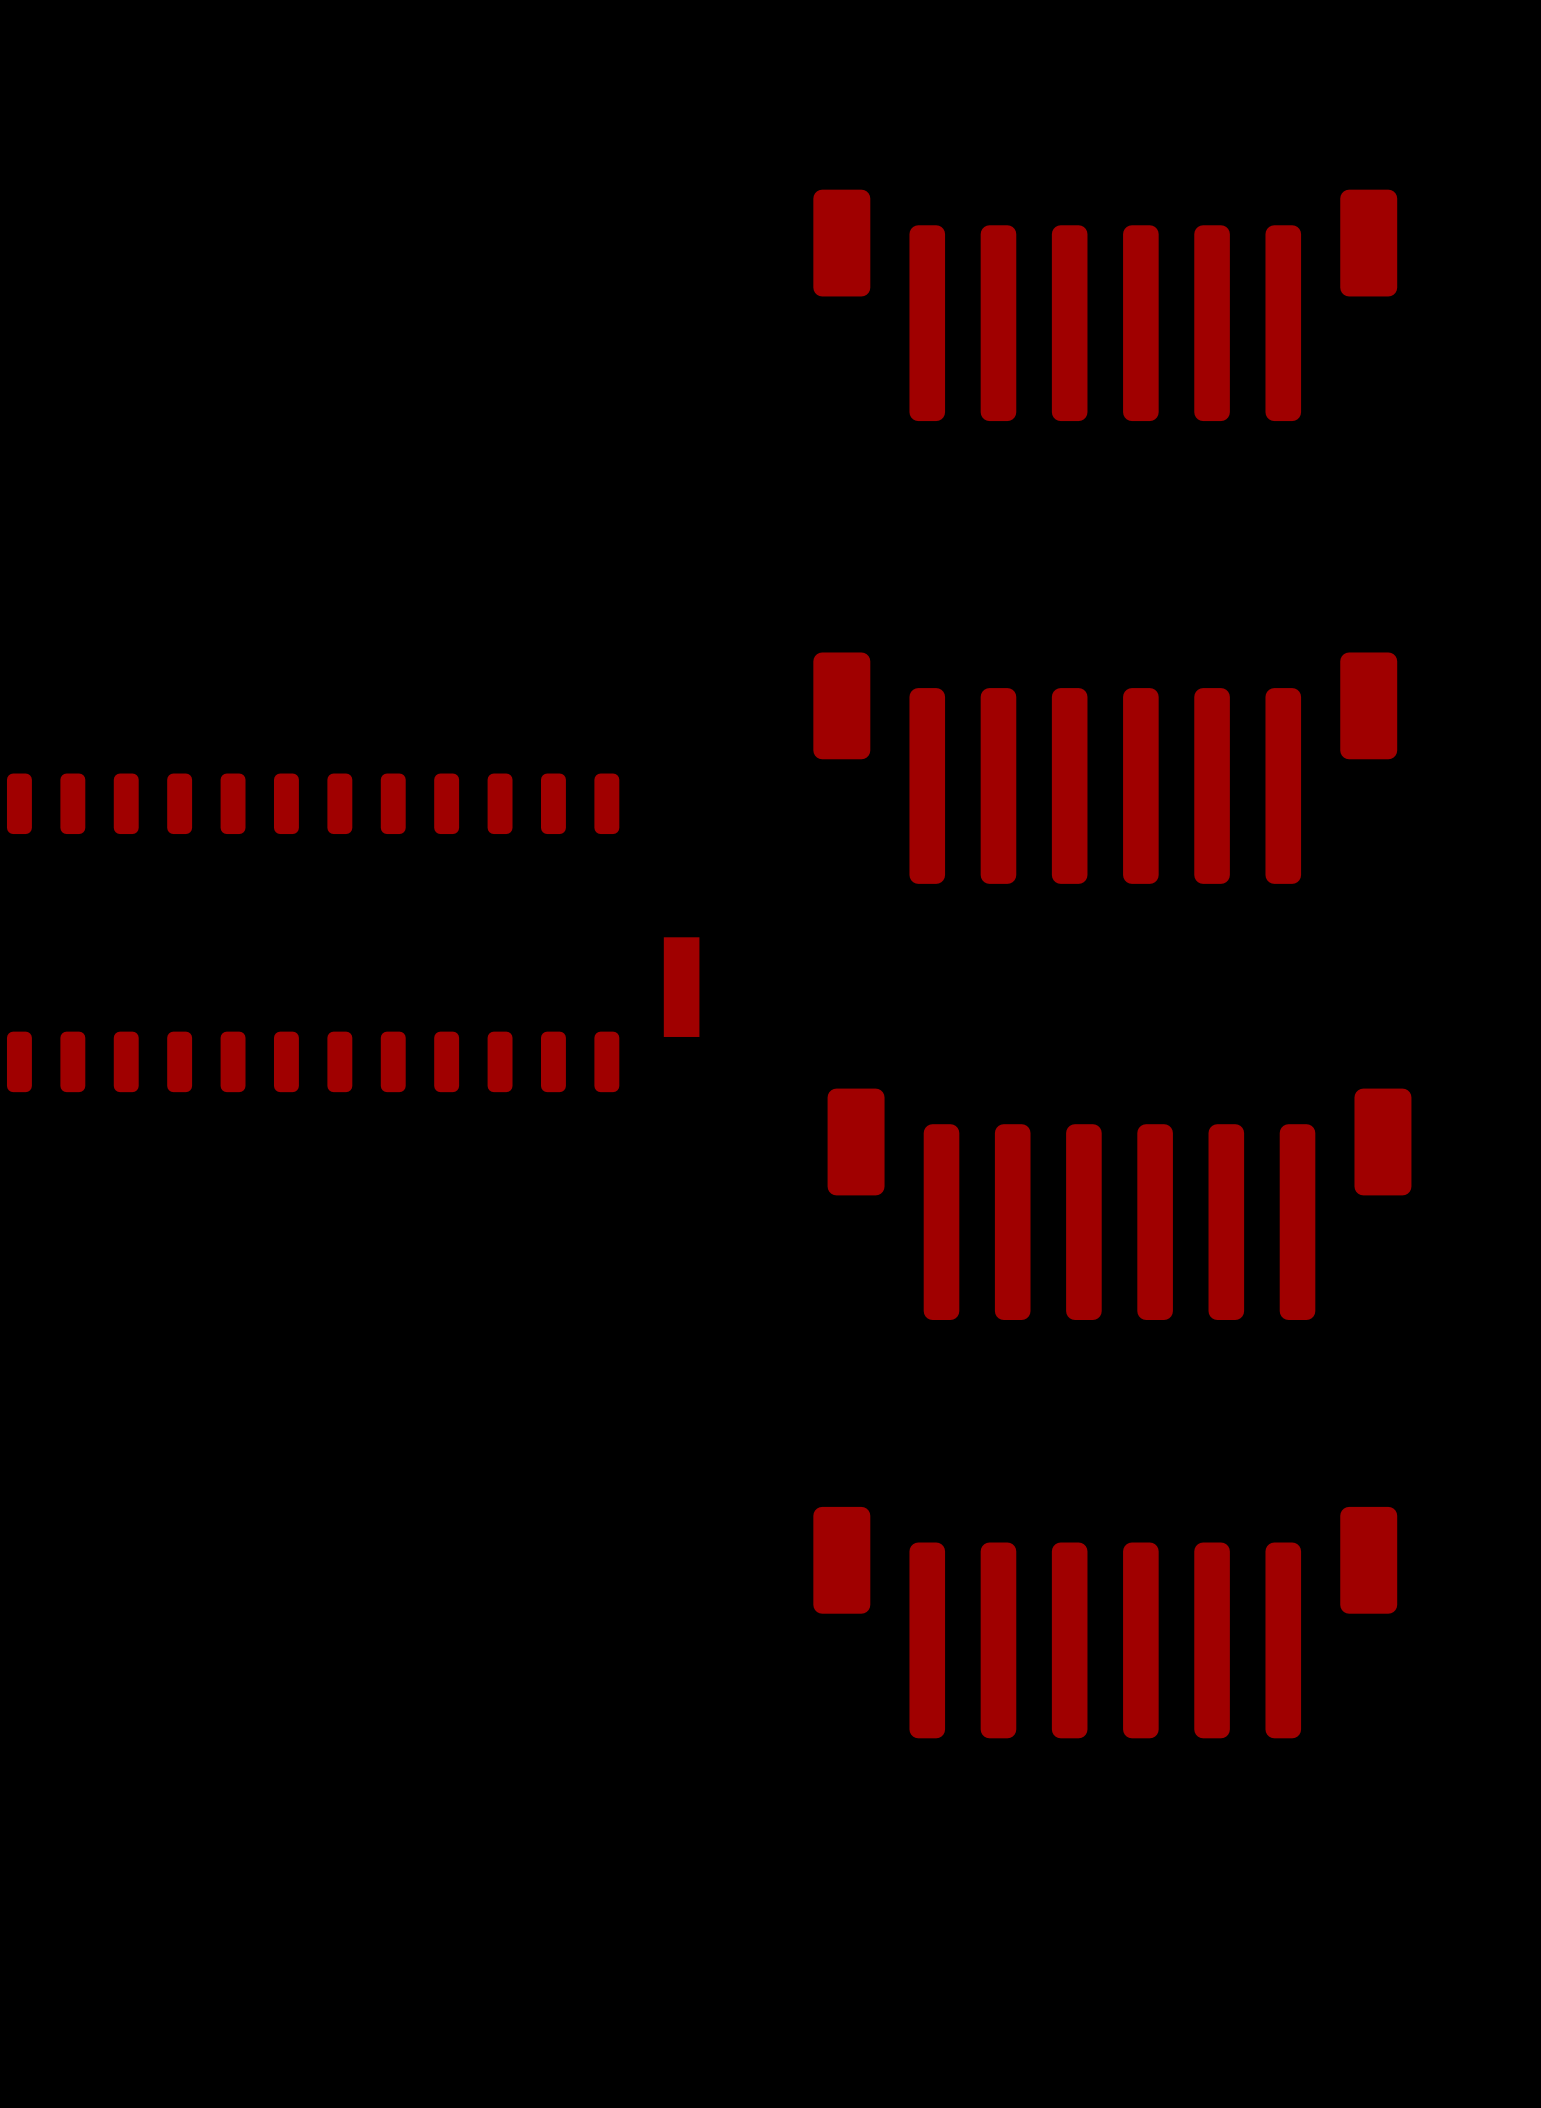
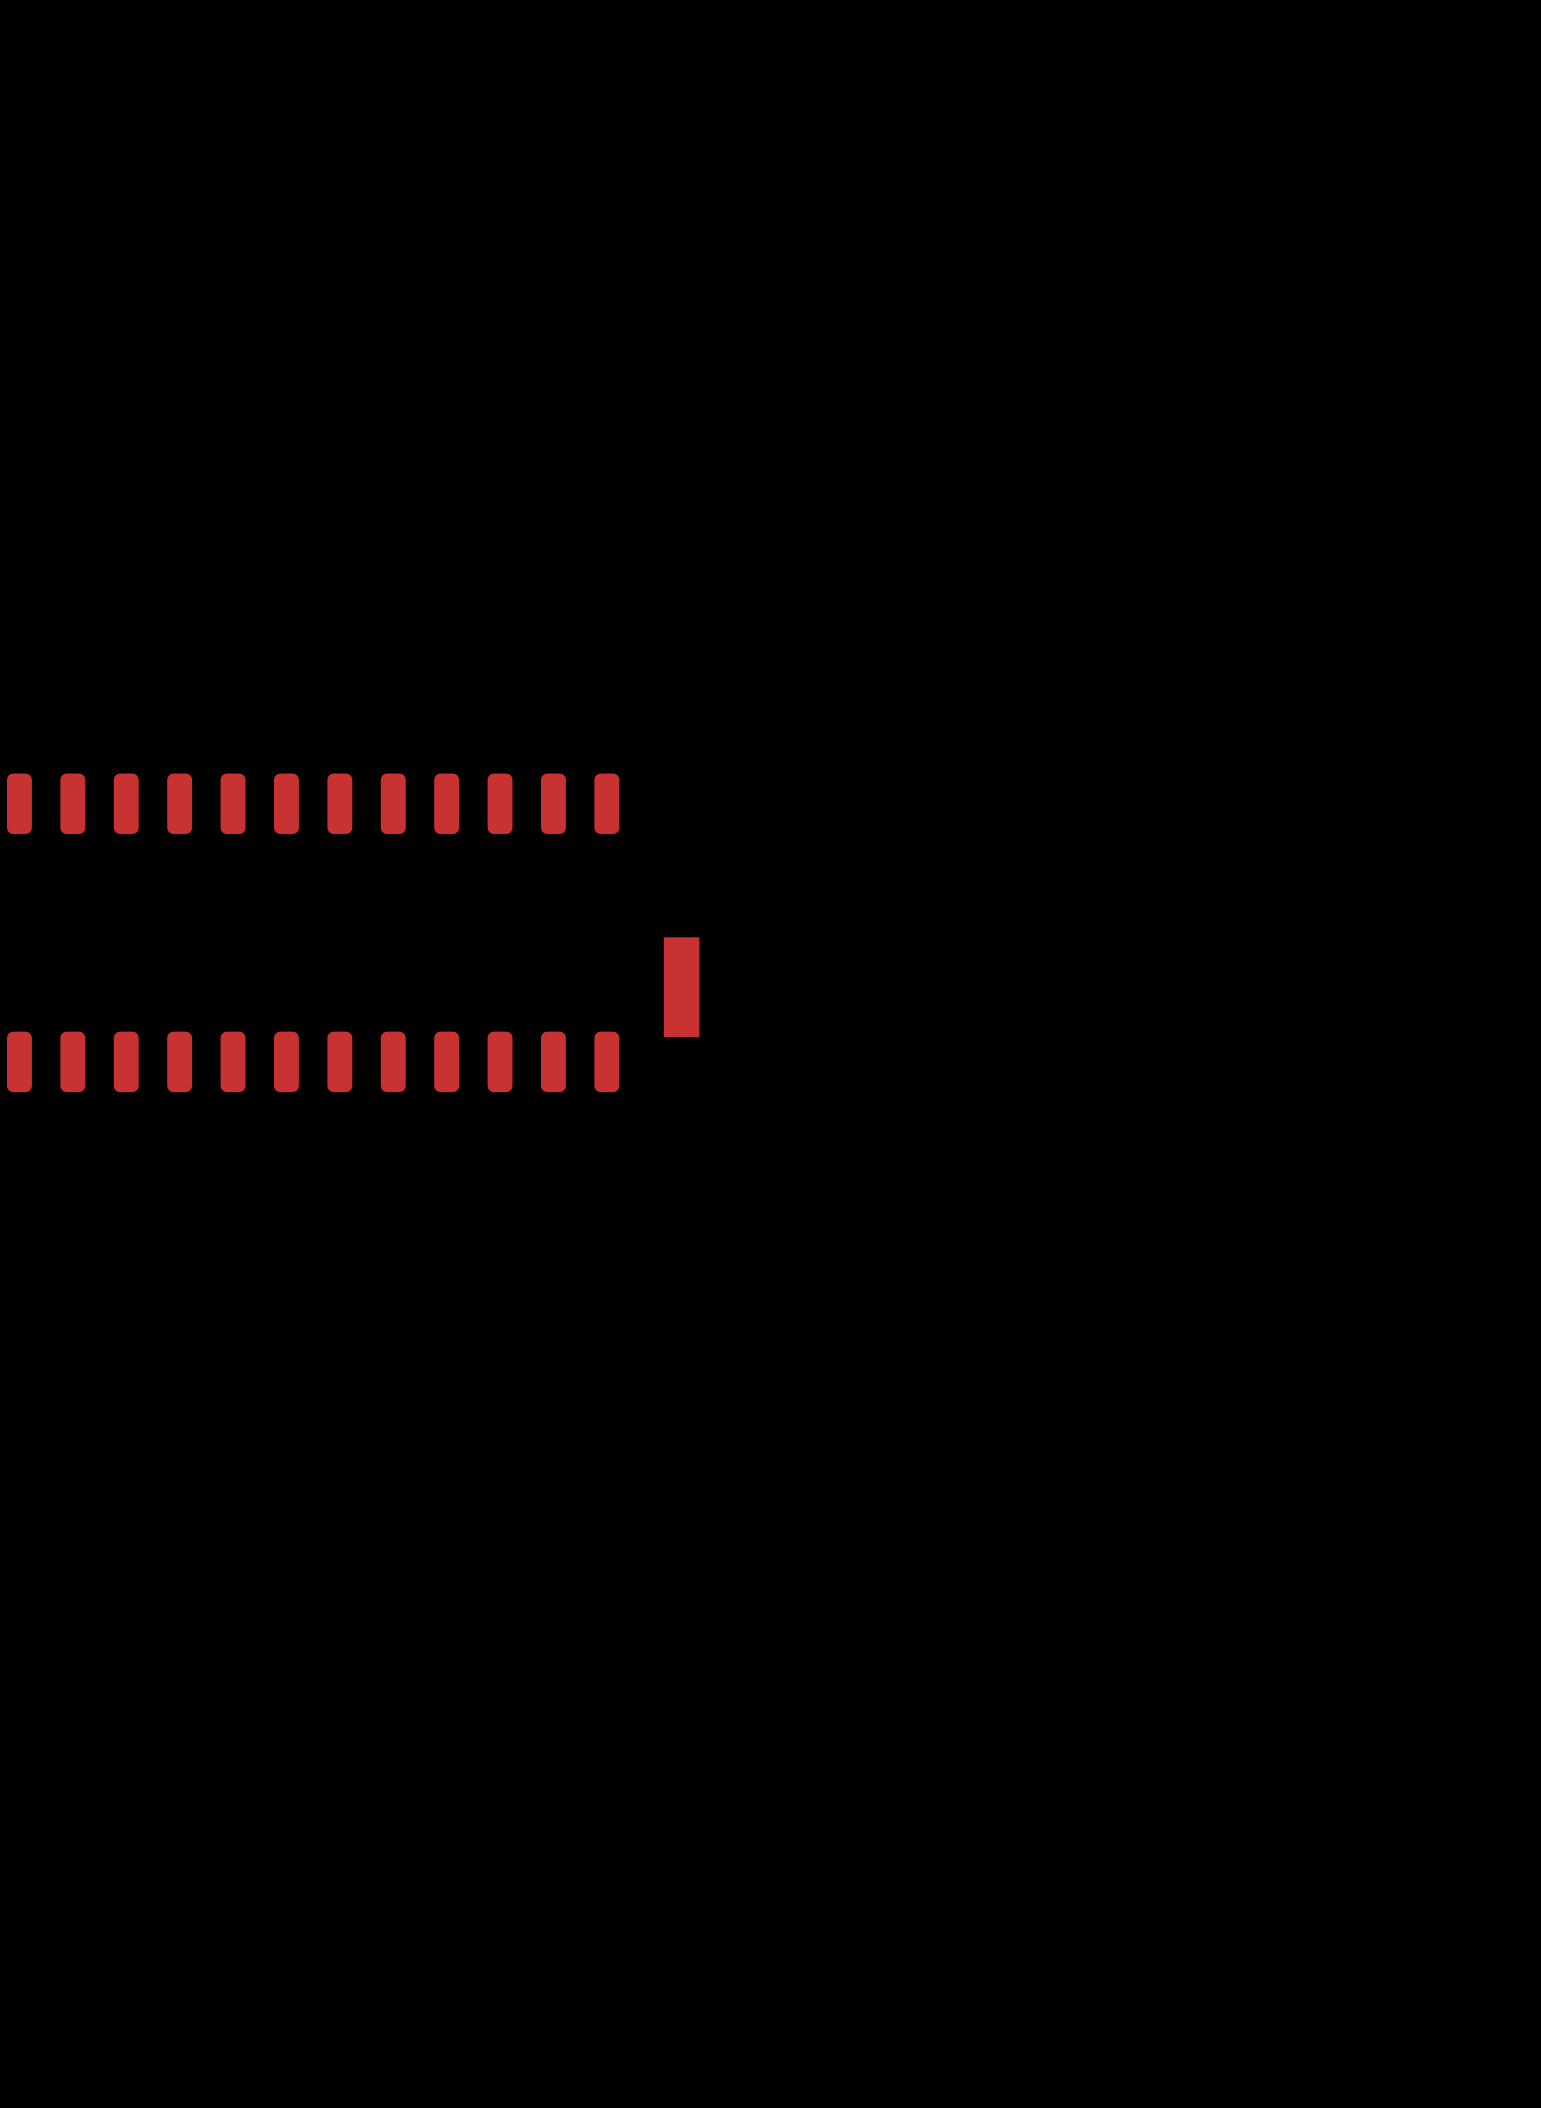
part: (1105, 305) -> none
part: (1105, 768) -> none
part: (1119, 1204) -> none
part: (1105, 1622) -> none

